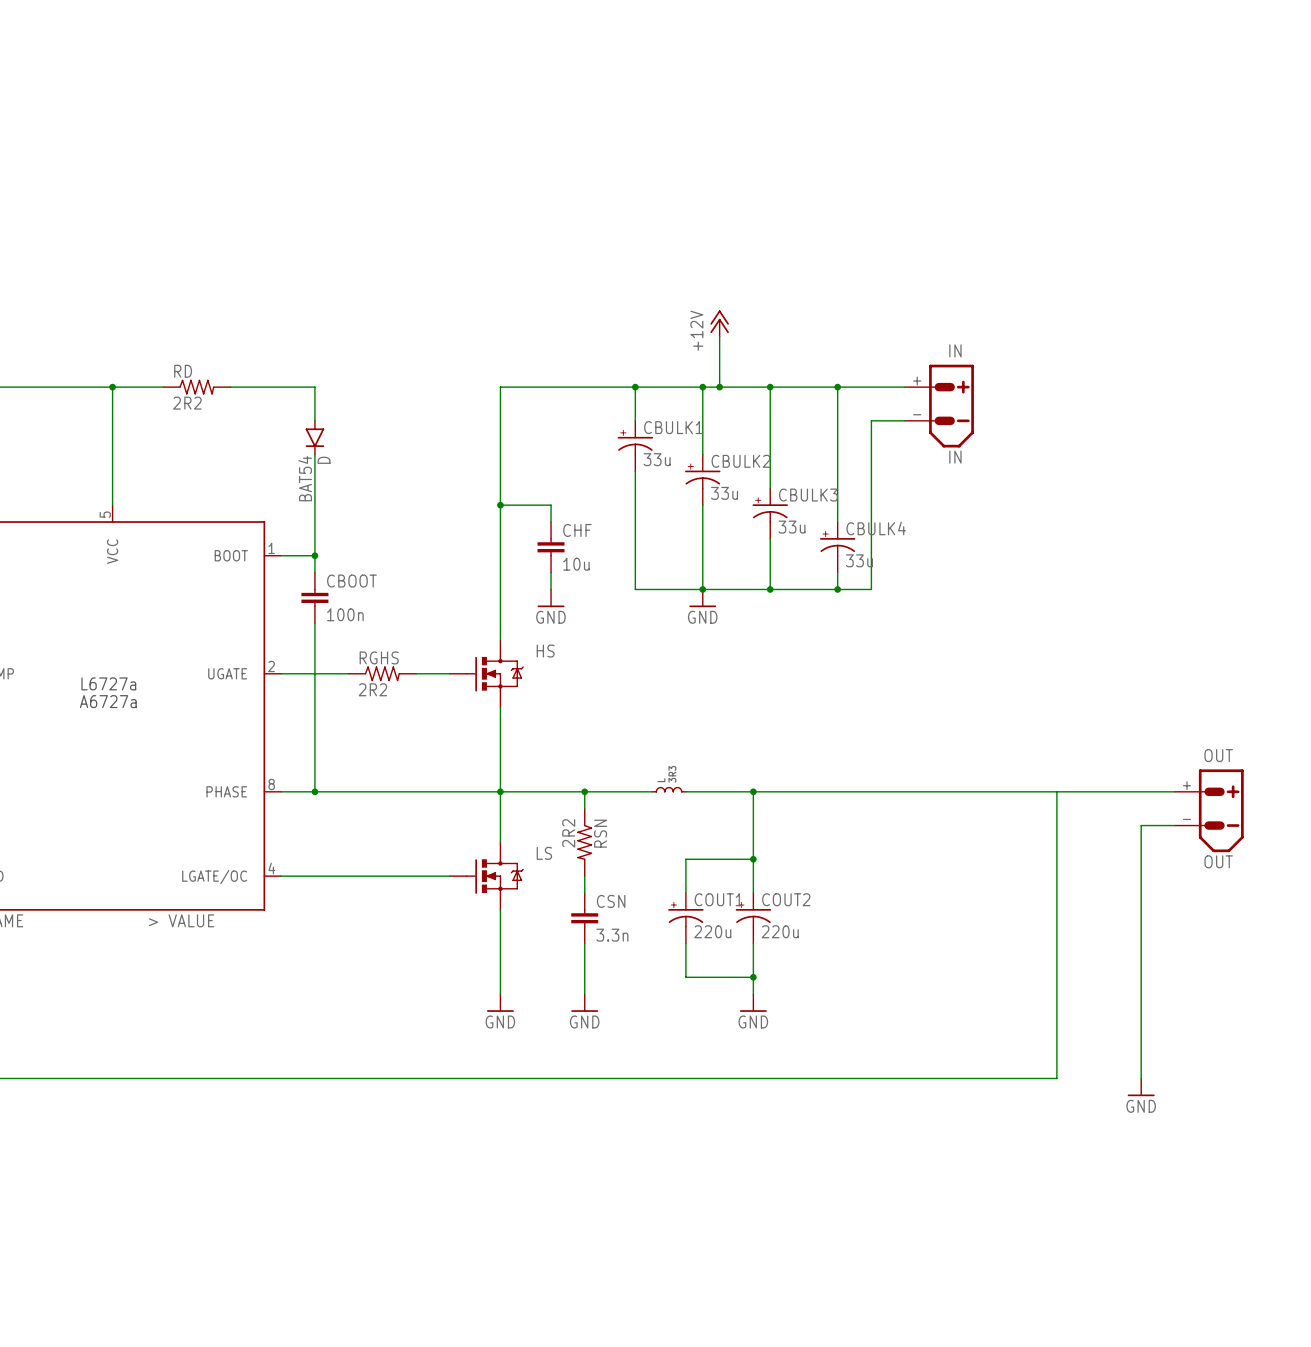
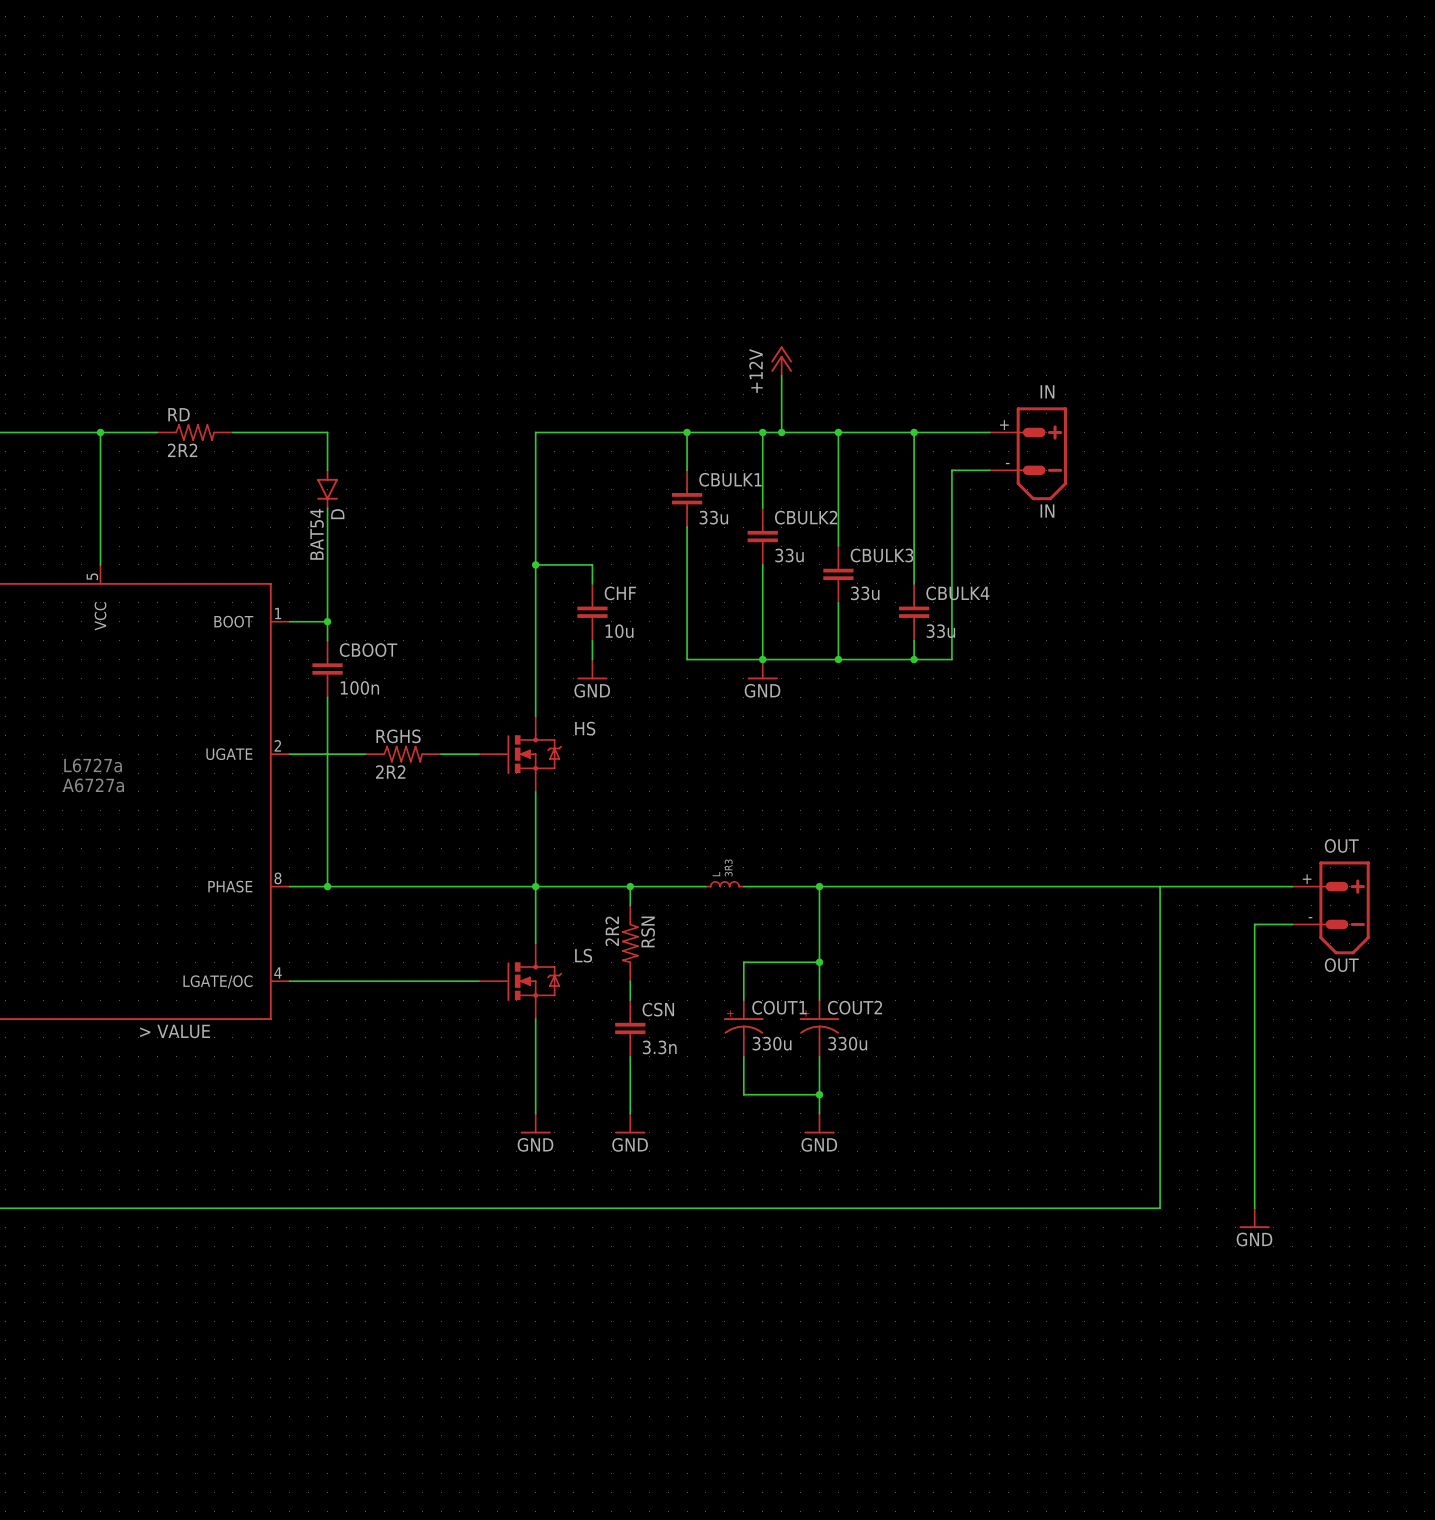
CBULK1 symbol: [617, 420, 654, 472] -> [671, 470, 703, 528]
CBULK2 symbol: [685, 454, 721, 506] -> [747, 508, 778, 565]
CBULK3 symbol: [752, 488, 788, 539] -> [823, 546, 854, 603]
CBULK4 symbol: [819, 522, 856, 573] -> [898, 583, 930, 641]
COUT1 value: 220u (712, 931) -> 330u (772, 1043)
COUT2 value: 220u (780, 931) -> 330u (847, 1043)

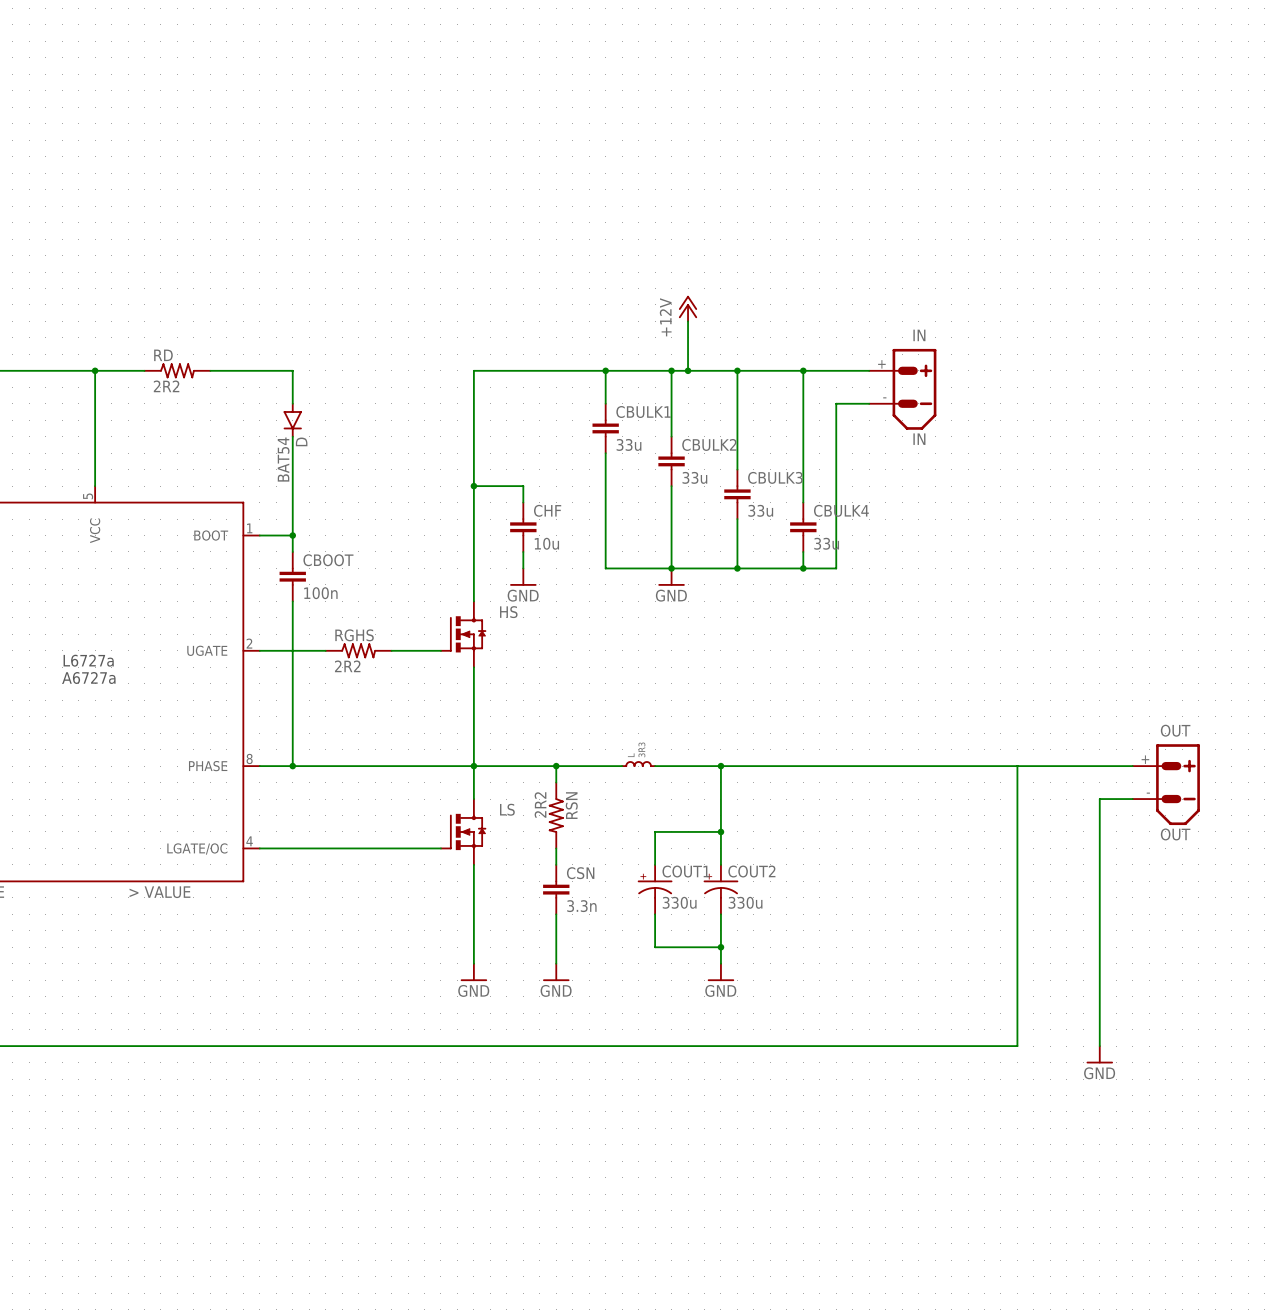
HS: none -> (463, 634)
HS: (520, 754) -> none
LS: none -> (463, 831)
LS: (520, 981) -> none

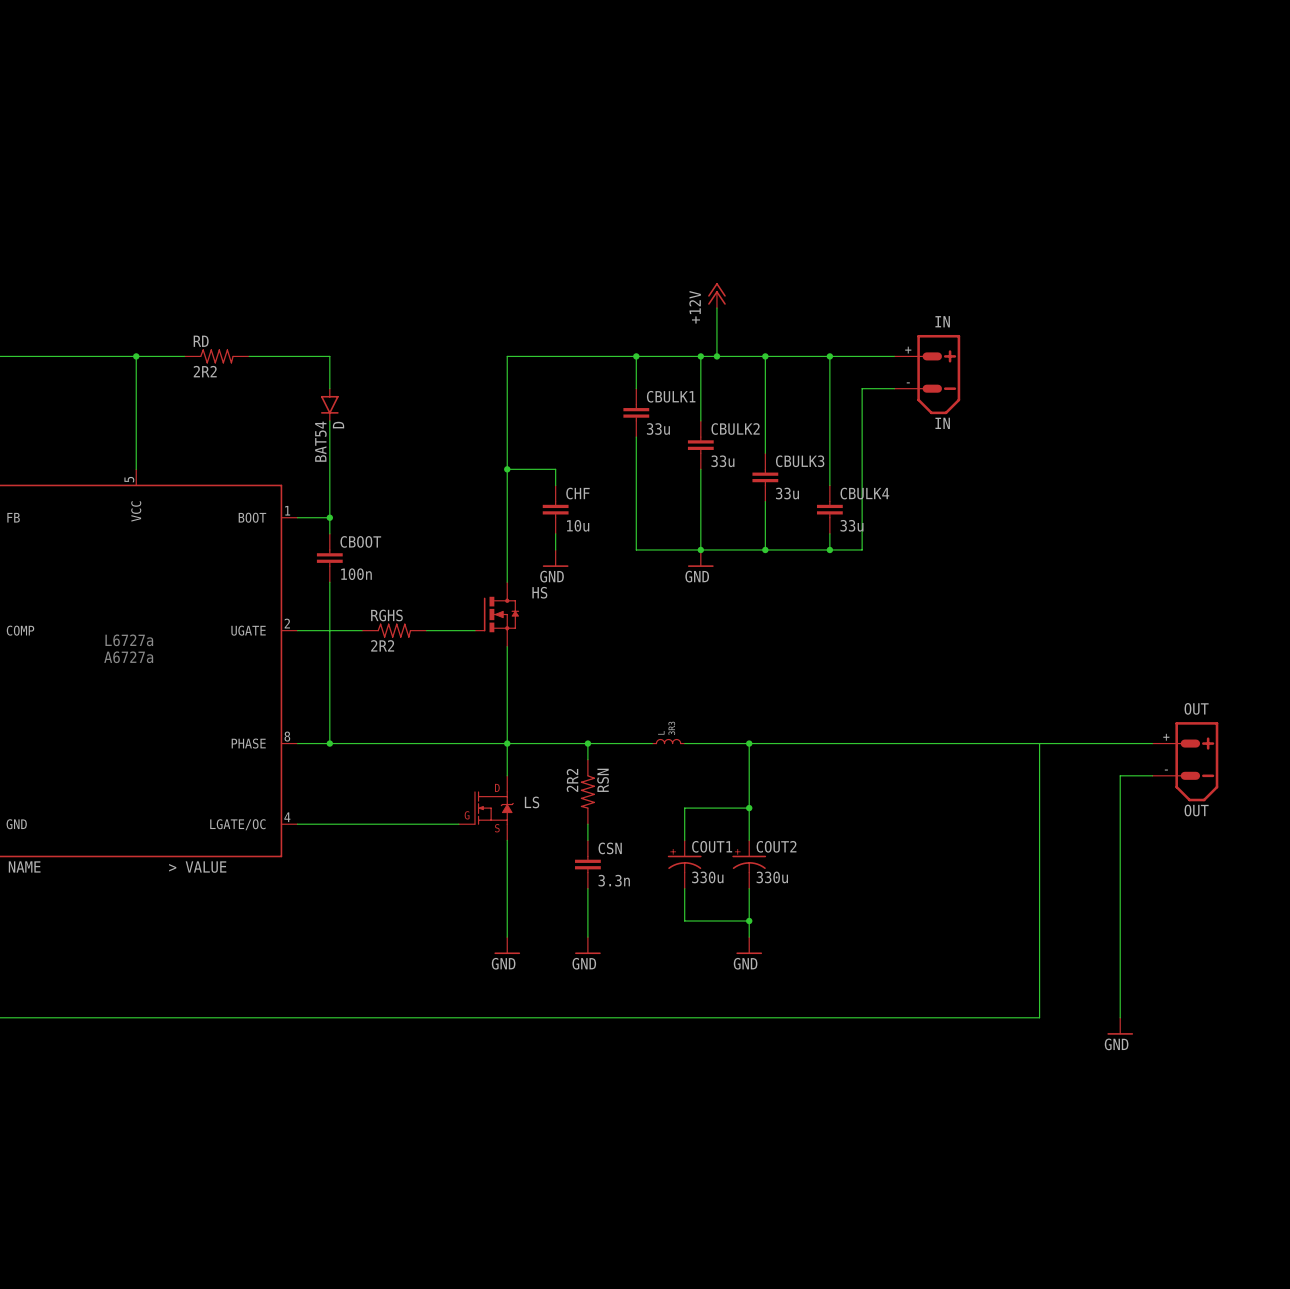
LS: none -> (486, 808)
LS: (463, 831) -> none

